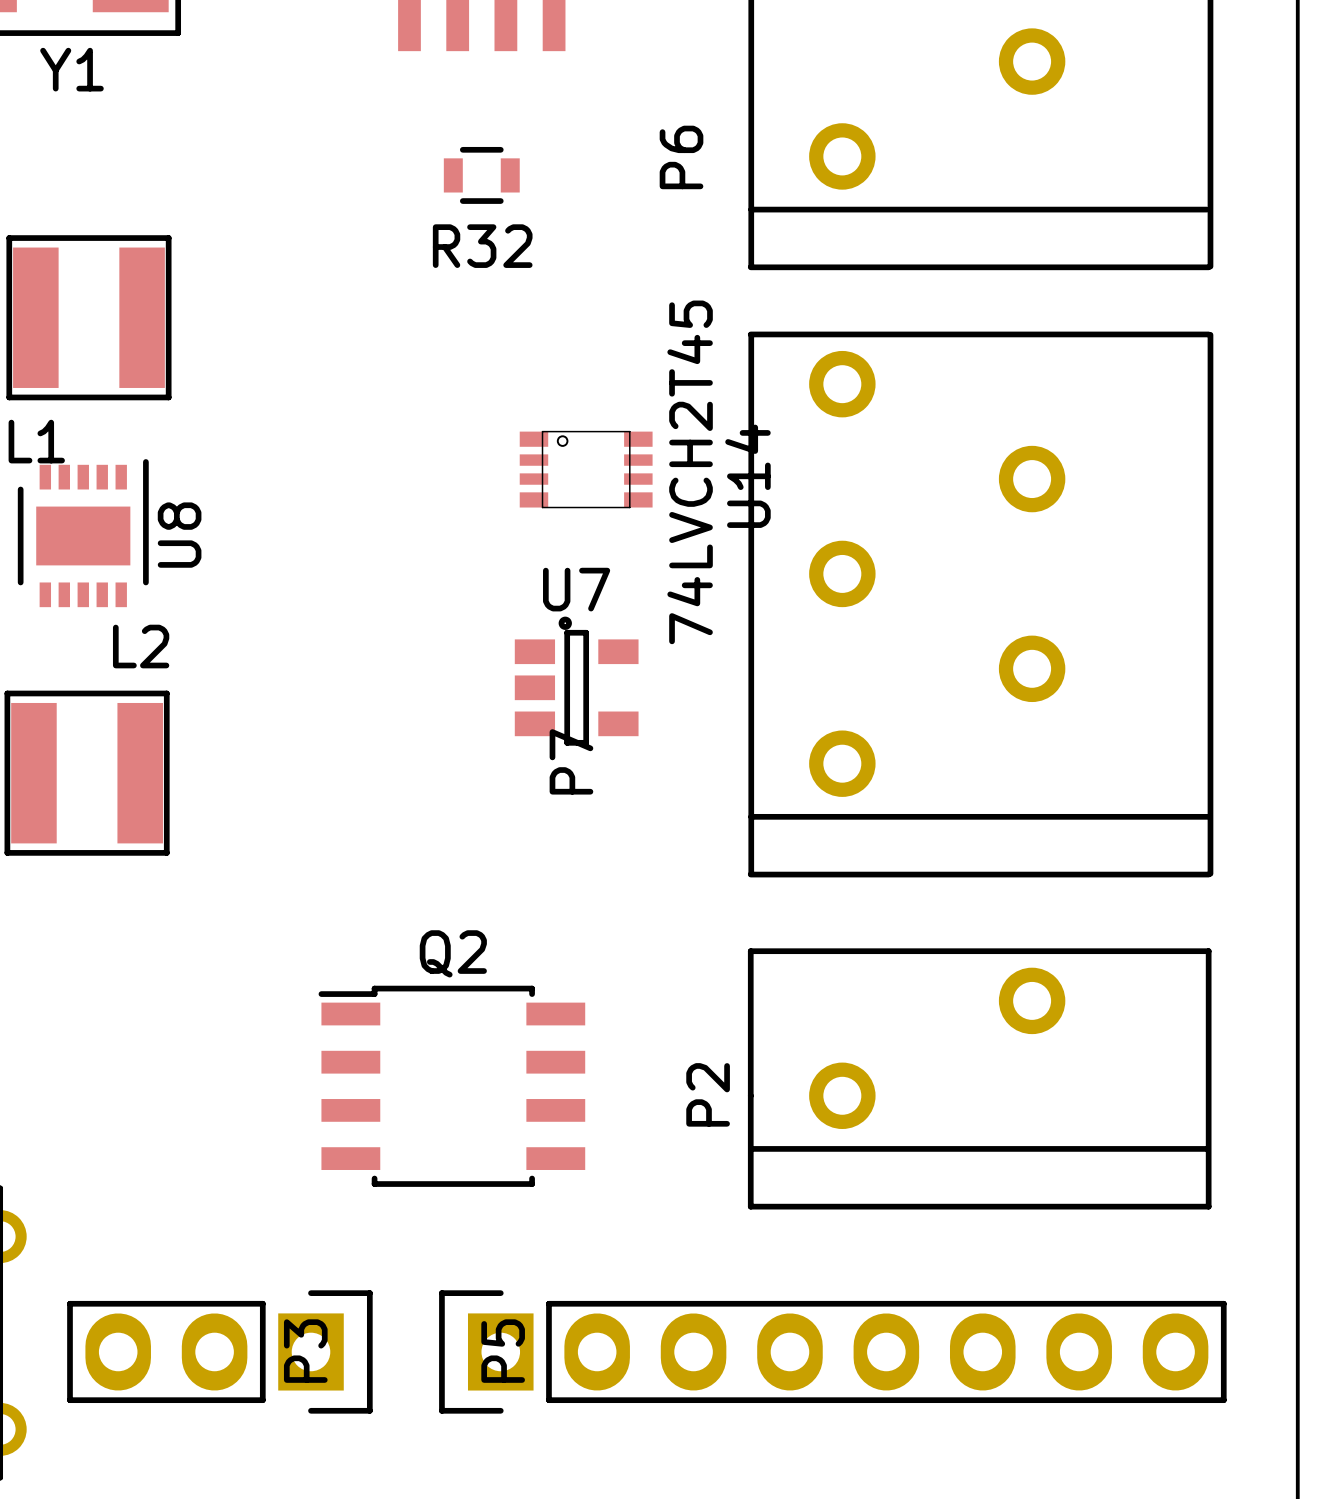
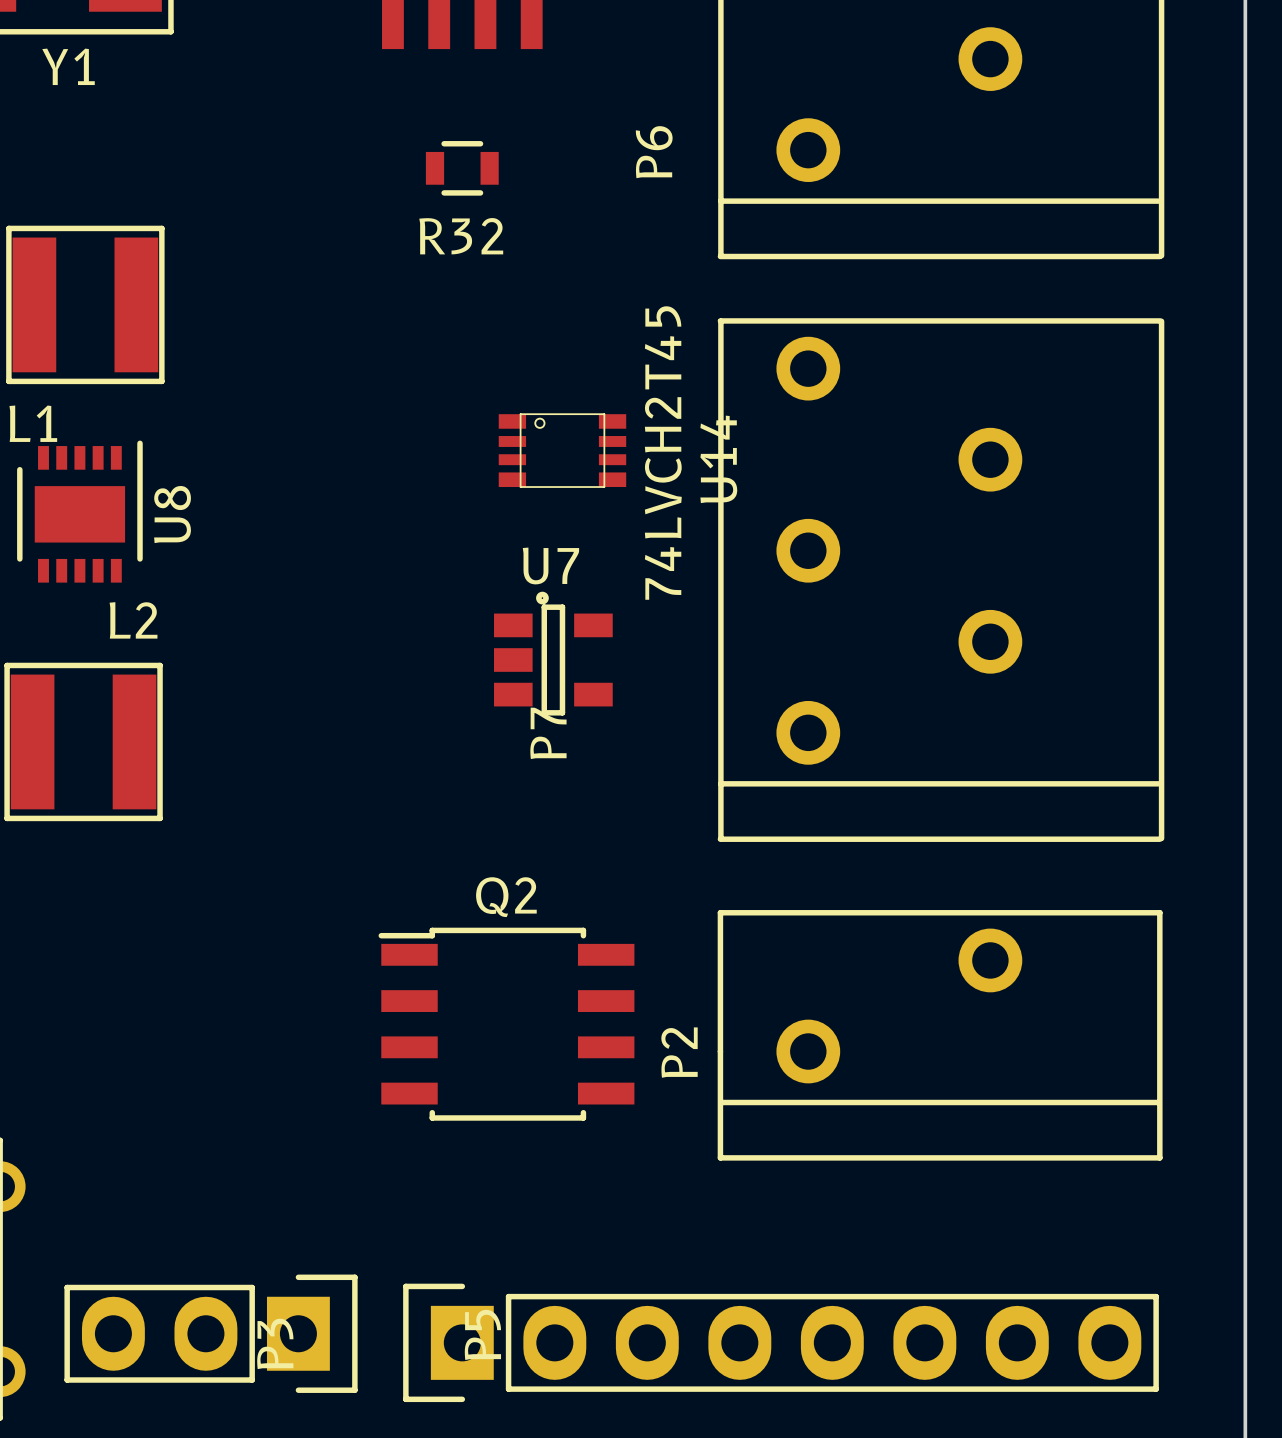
Q2 position: (451, 1086) -> (506, 1024)
P5 position: (219, 1351) -> (211, 1333)
P3 position: (832, 1351) -> (780, 1342)

